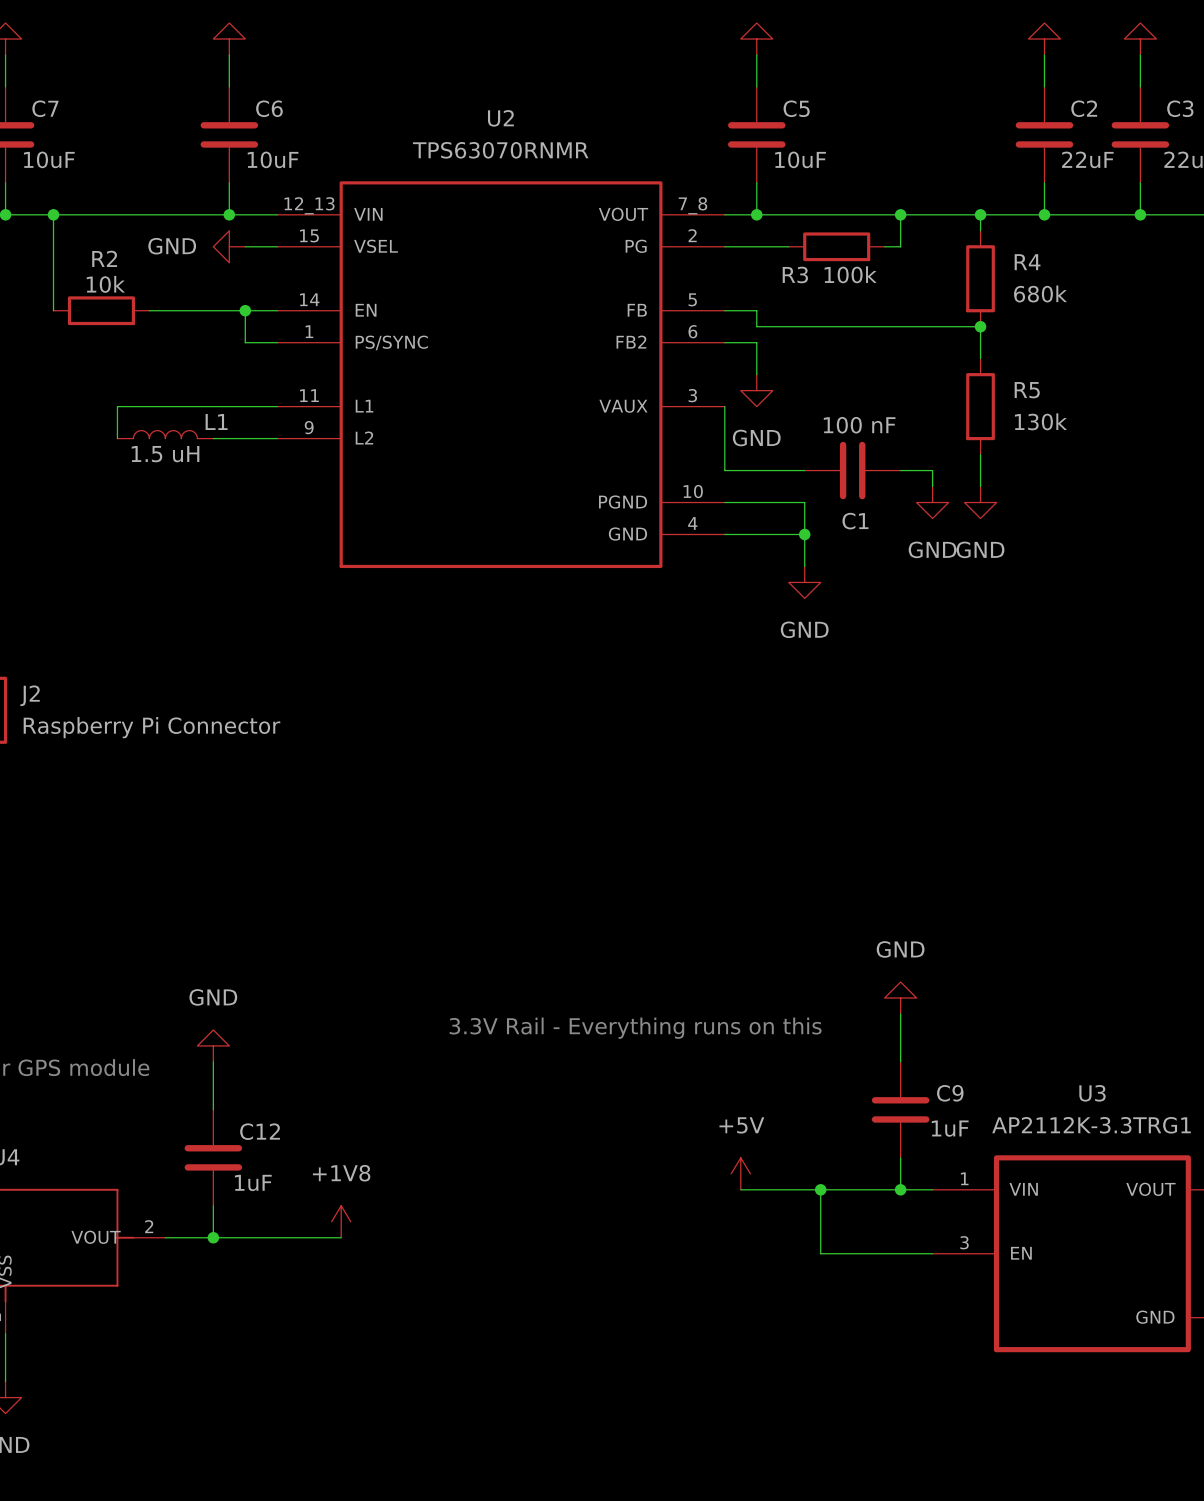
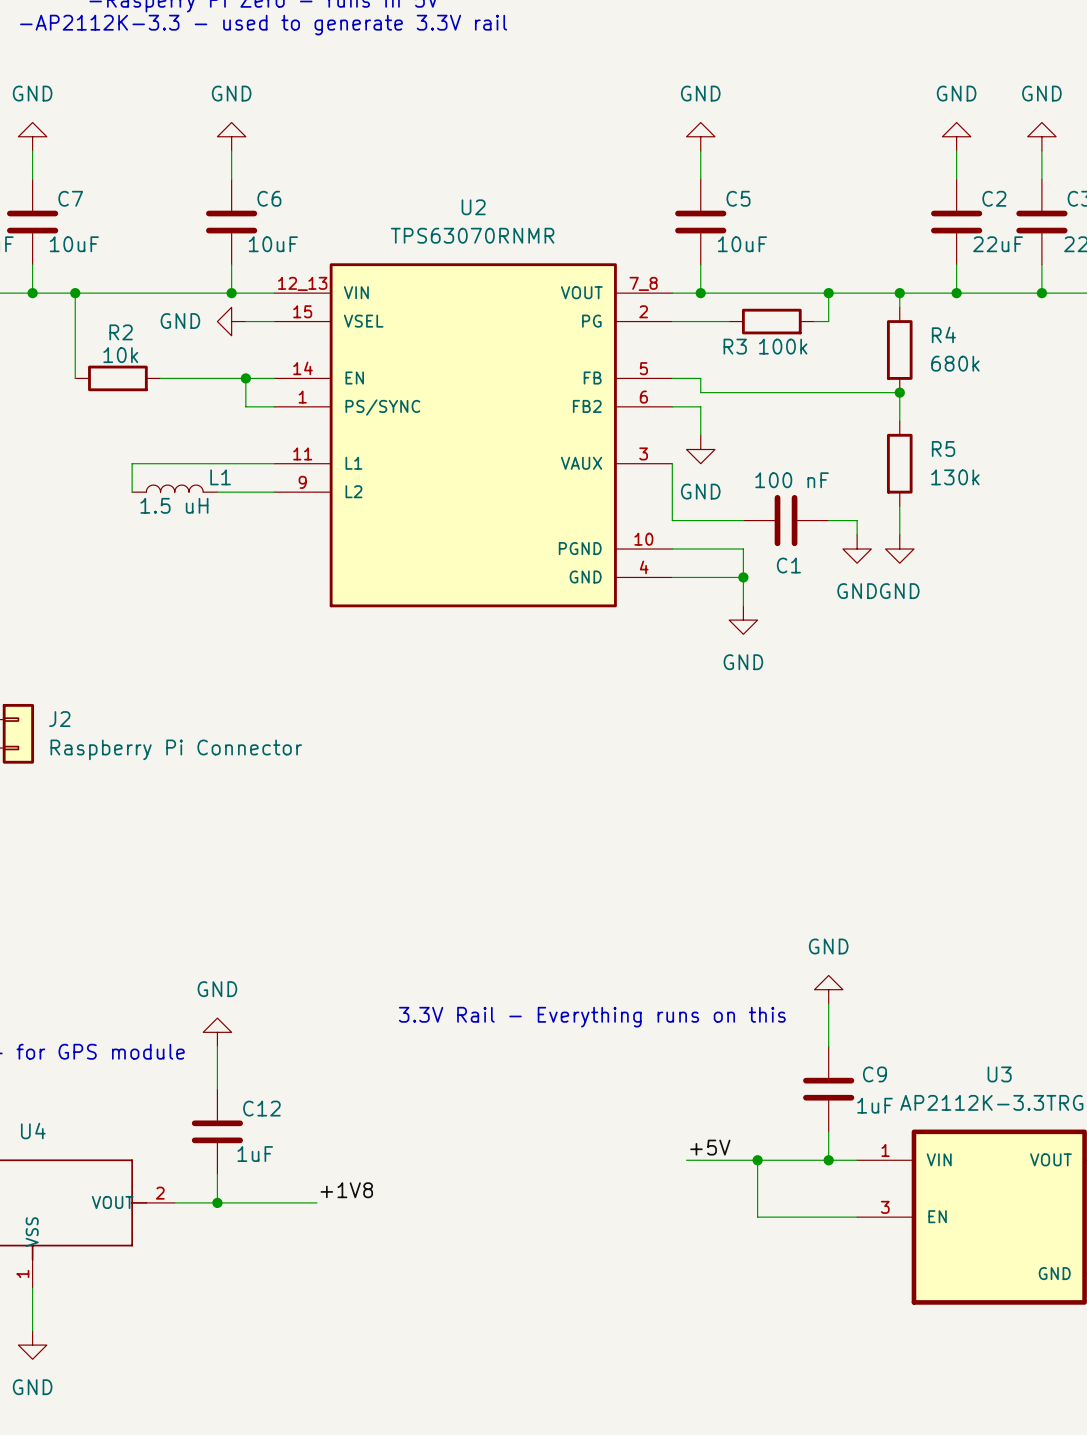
power symbol: +5V (740, 1173) -> none
label: none -> +5V (710, 1147)
power symbol: +1V8 (341, 1221) -> none
label: none -> +1V8 (346, 1190)
wire: (325, 1237) (341, 1237) -> none

